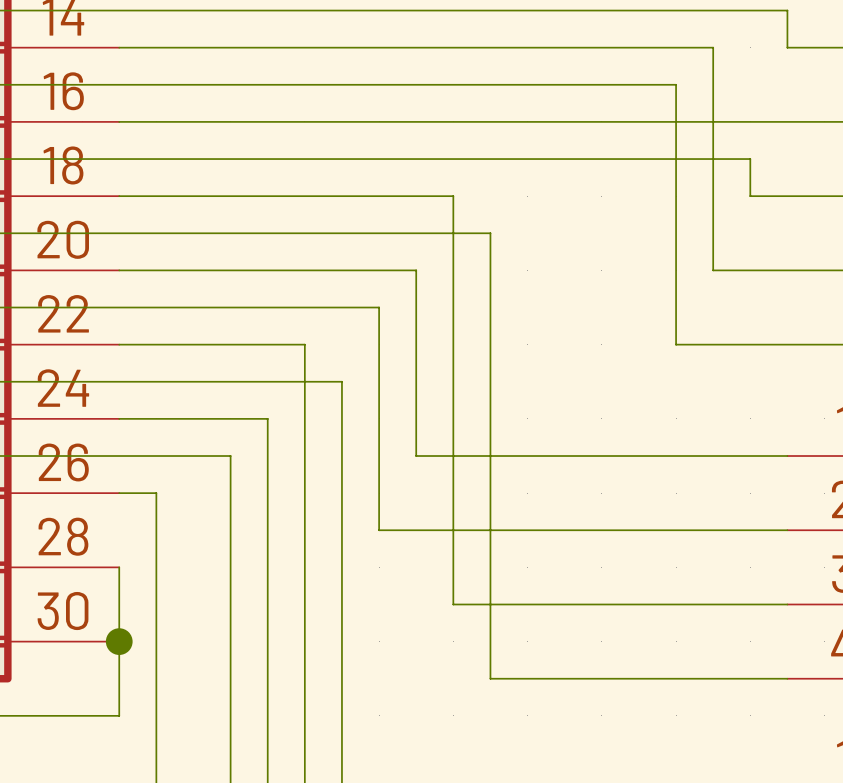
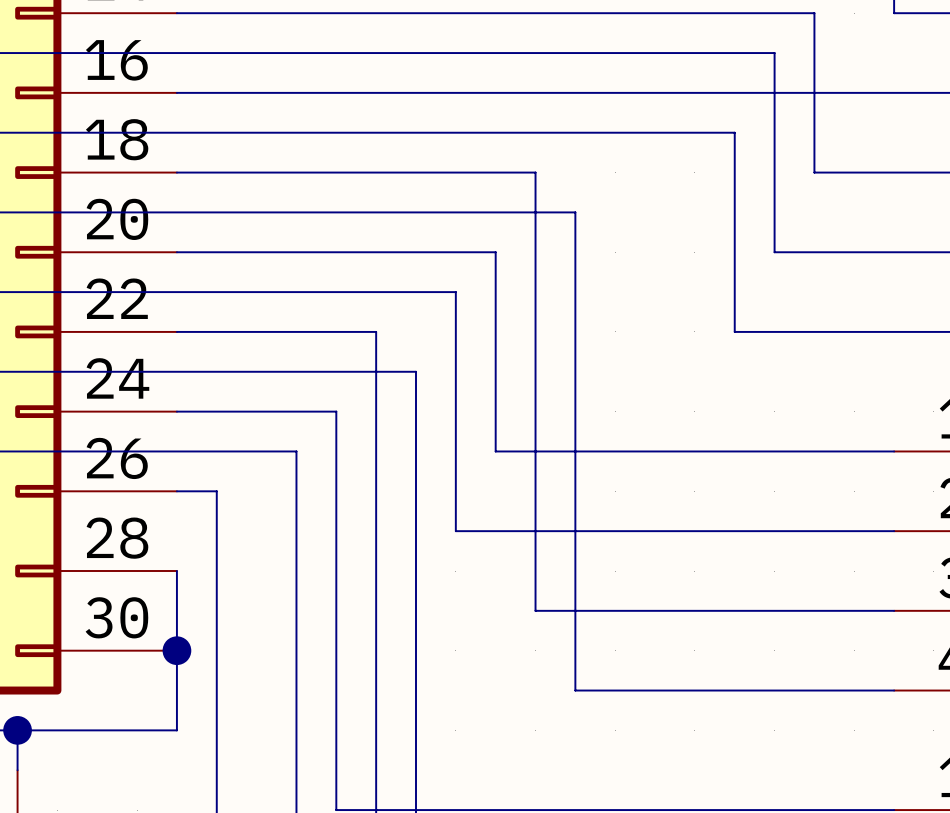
wire: (638, 159) (750, 159) (750, 196) -> (734, 132) (734, 331) (774, 331)
wire: (713, 196) (713, 270) -> (814, 172) (854, 172)
wire: (676, 270) (676, 344) -> (774, 252) (814, 252)

